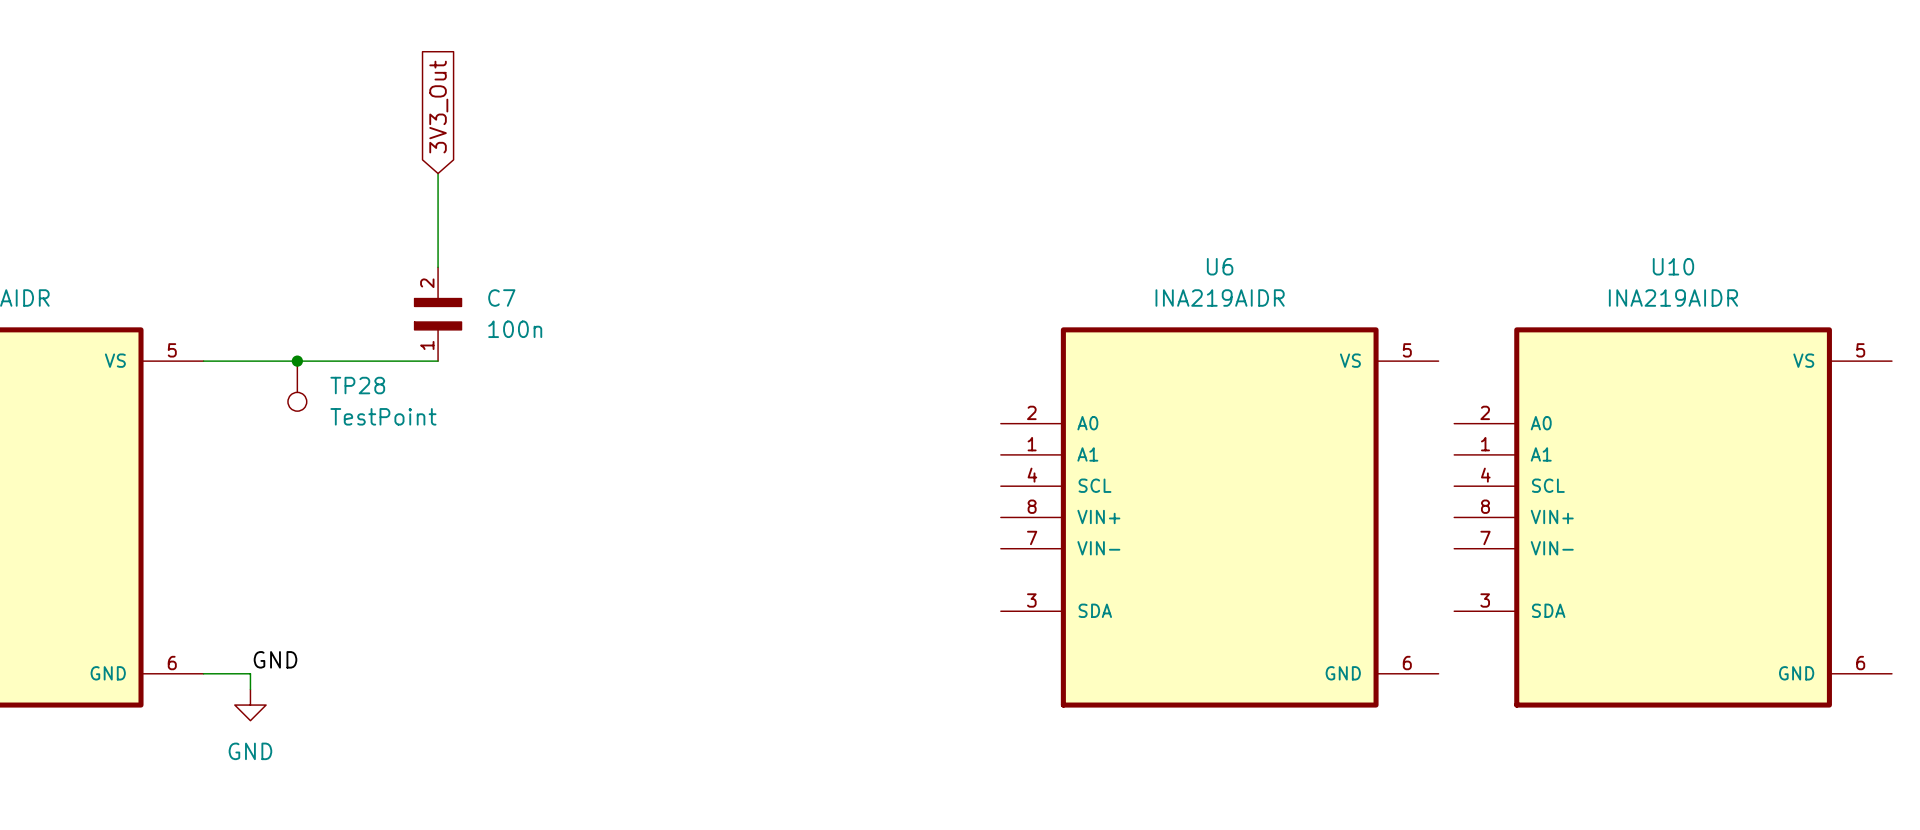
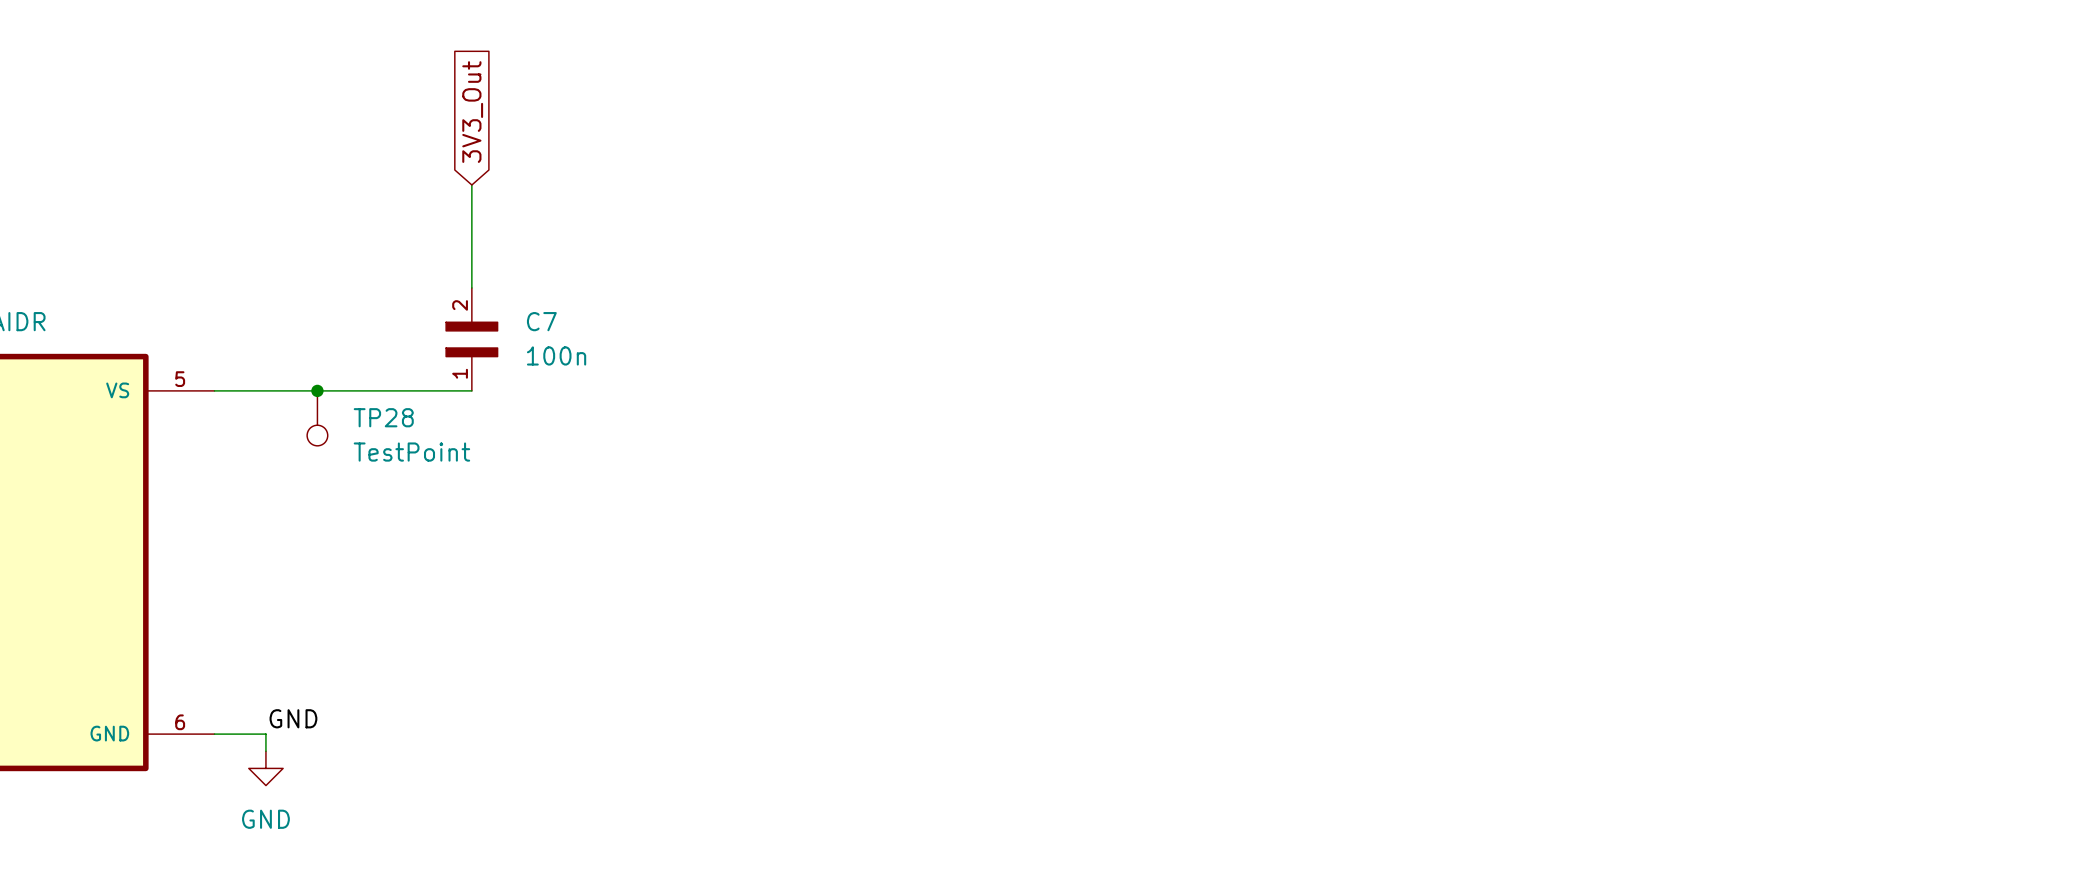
U6: INA219AIDR (1219, 517) -> none
U10: INA219AIDR (1673, 517) -> none

